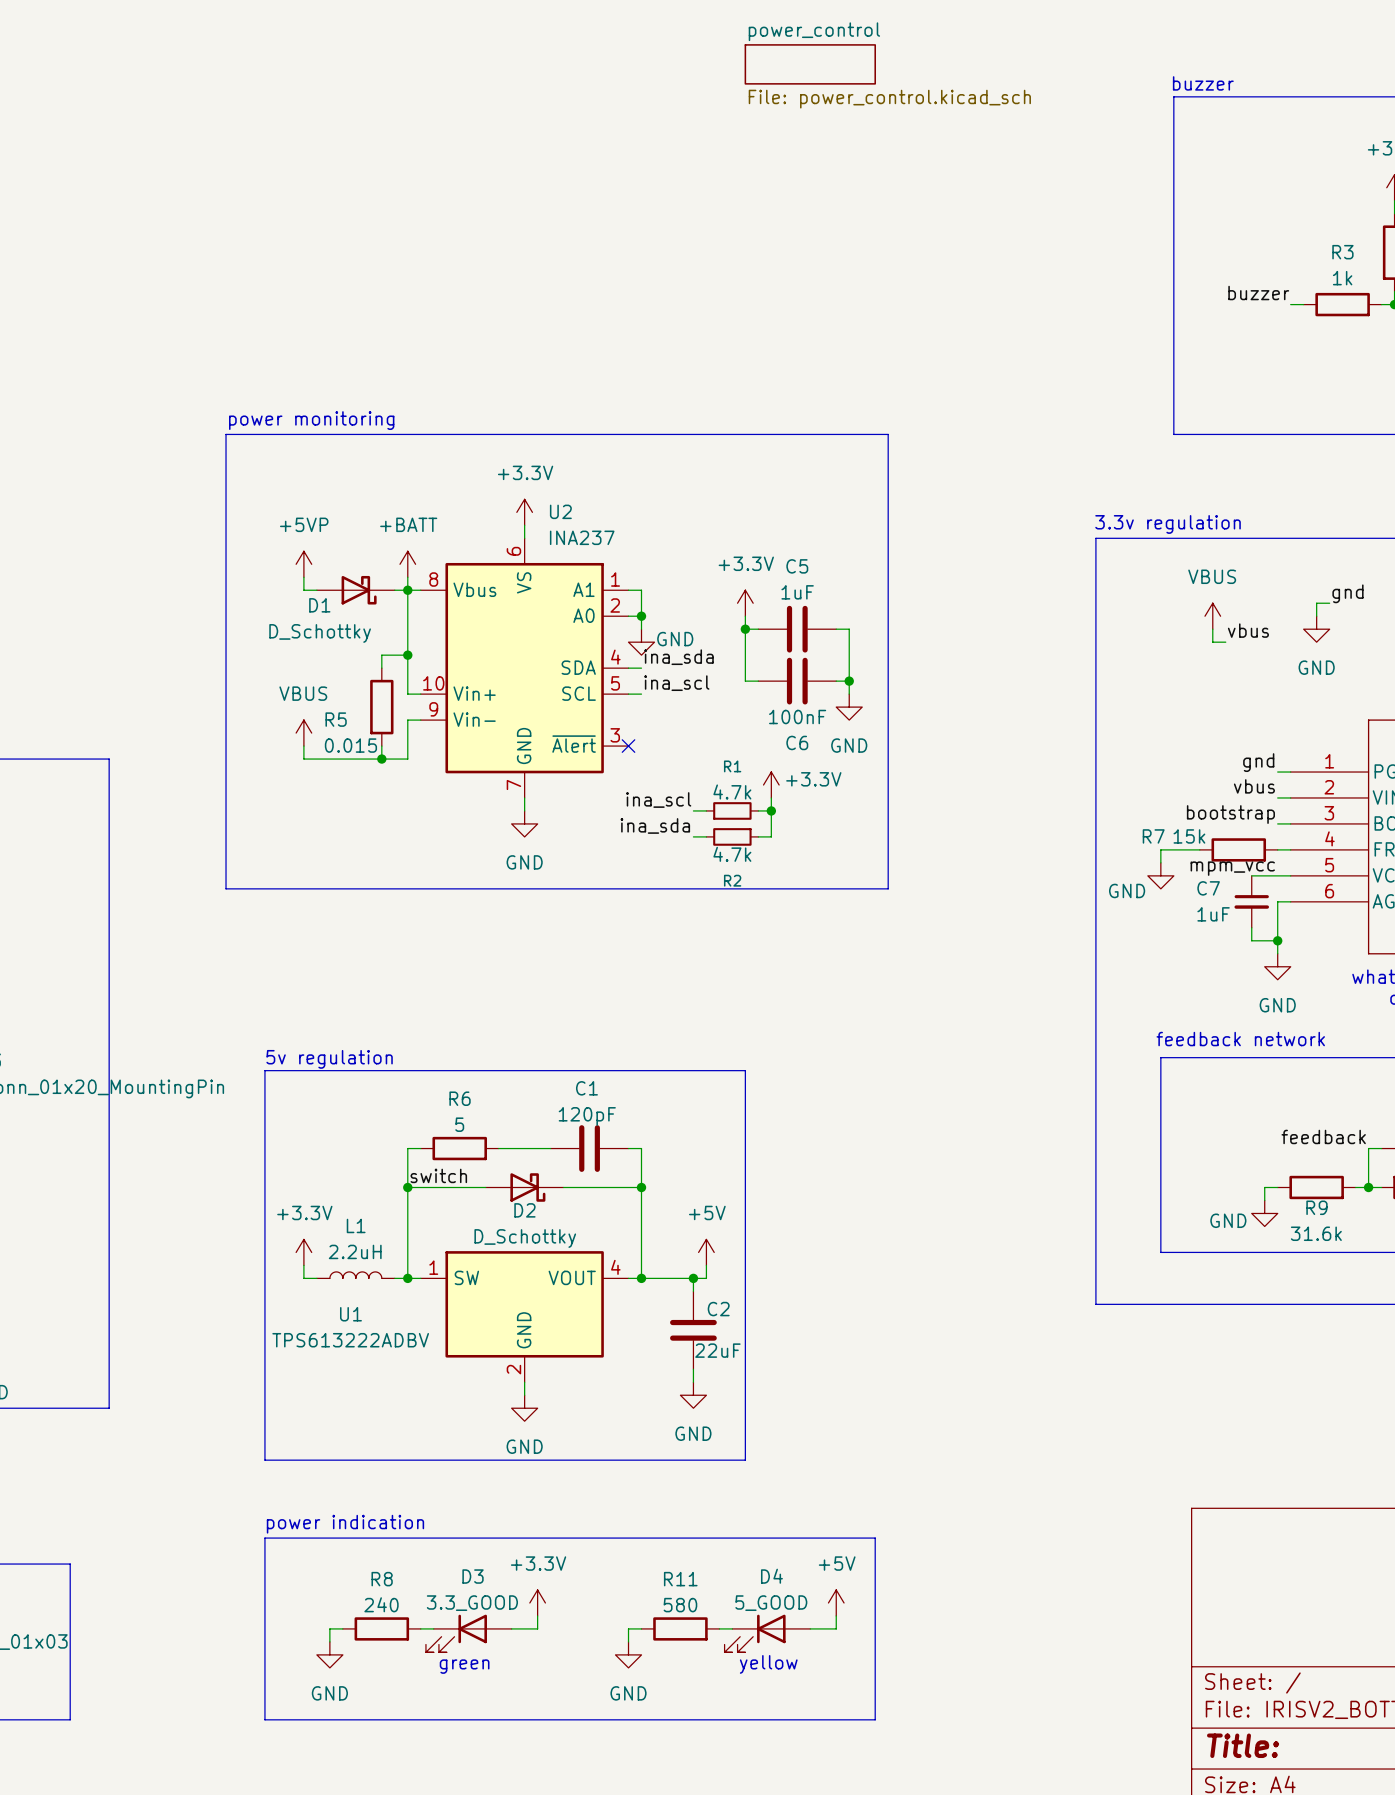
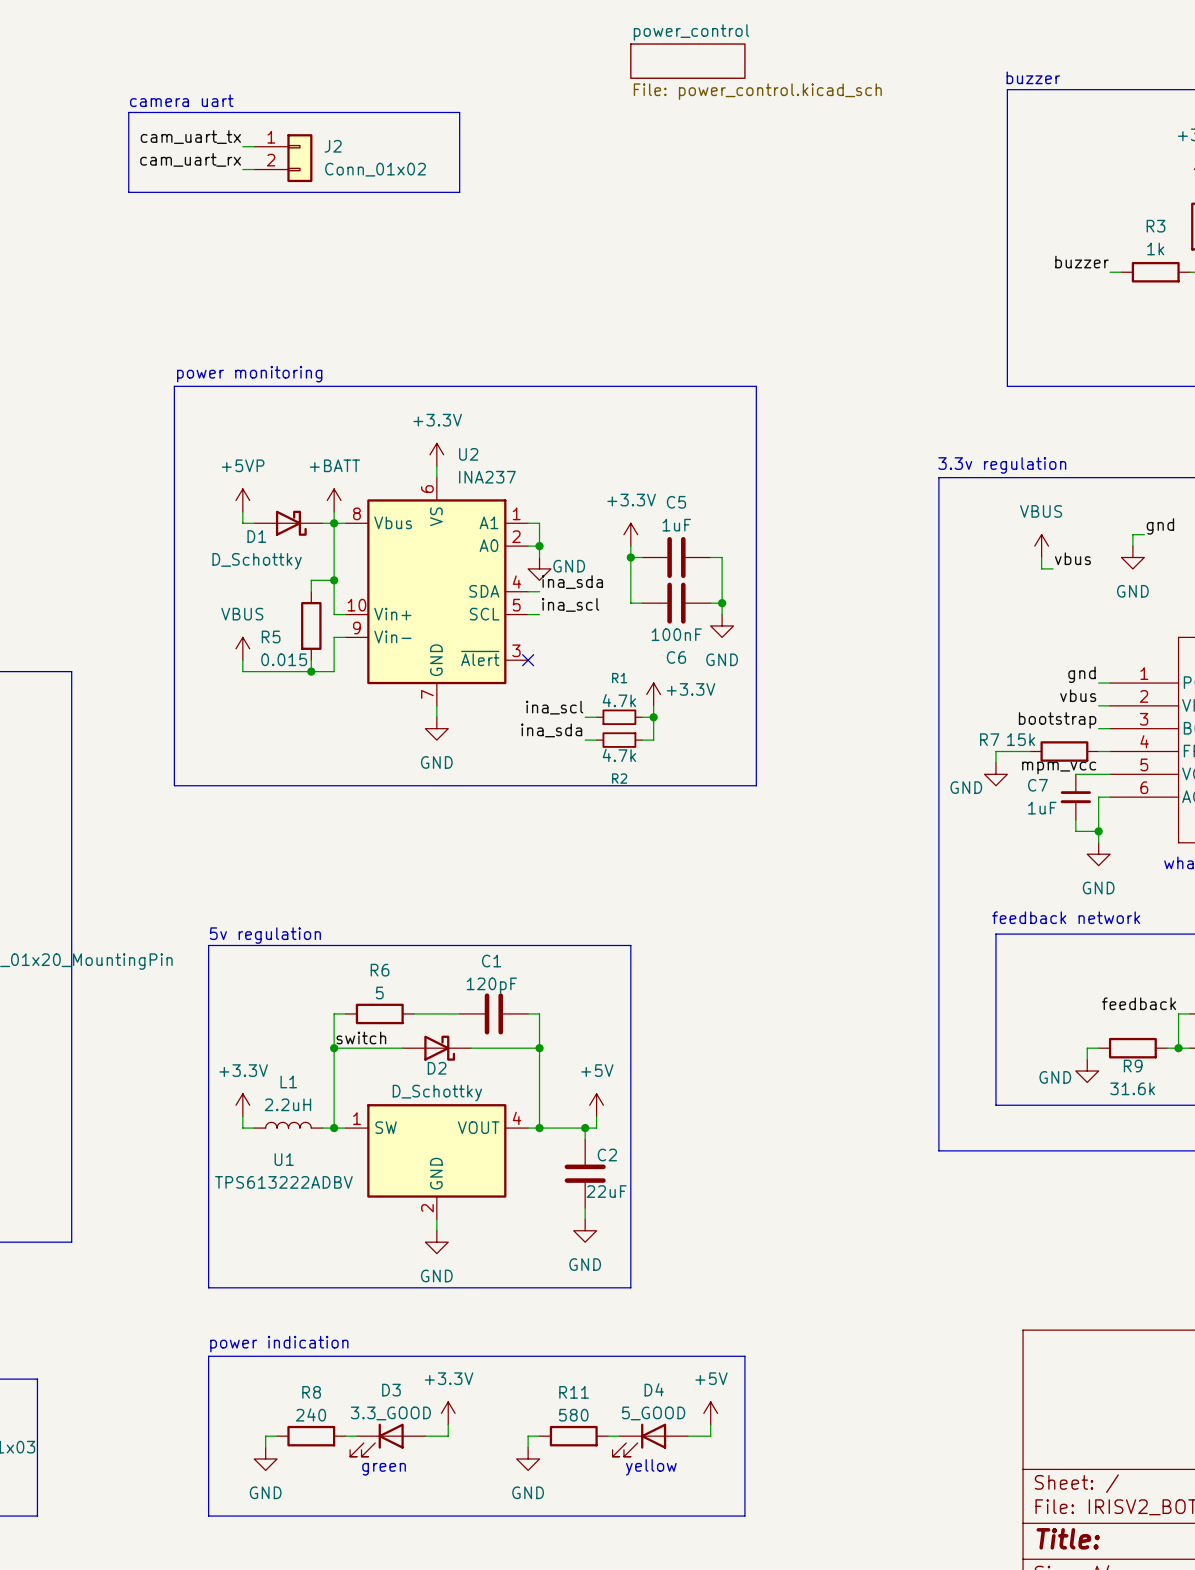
text: none -> camera uart (181, 100)
line: none -> (128, 112) (459, 112) (459, 192) (128, 192) (128, 112)
label: none -> cam_uart_tx (190, 137)
wire: none -> (242, 146) (254, 146)
J2: none -> Conn_01x02 (283, 158)
label: none -> cam_uart_rx (190, 159)
wire: none -> (242, 169) (254, 169)

